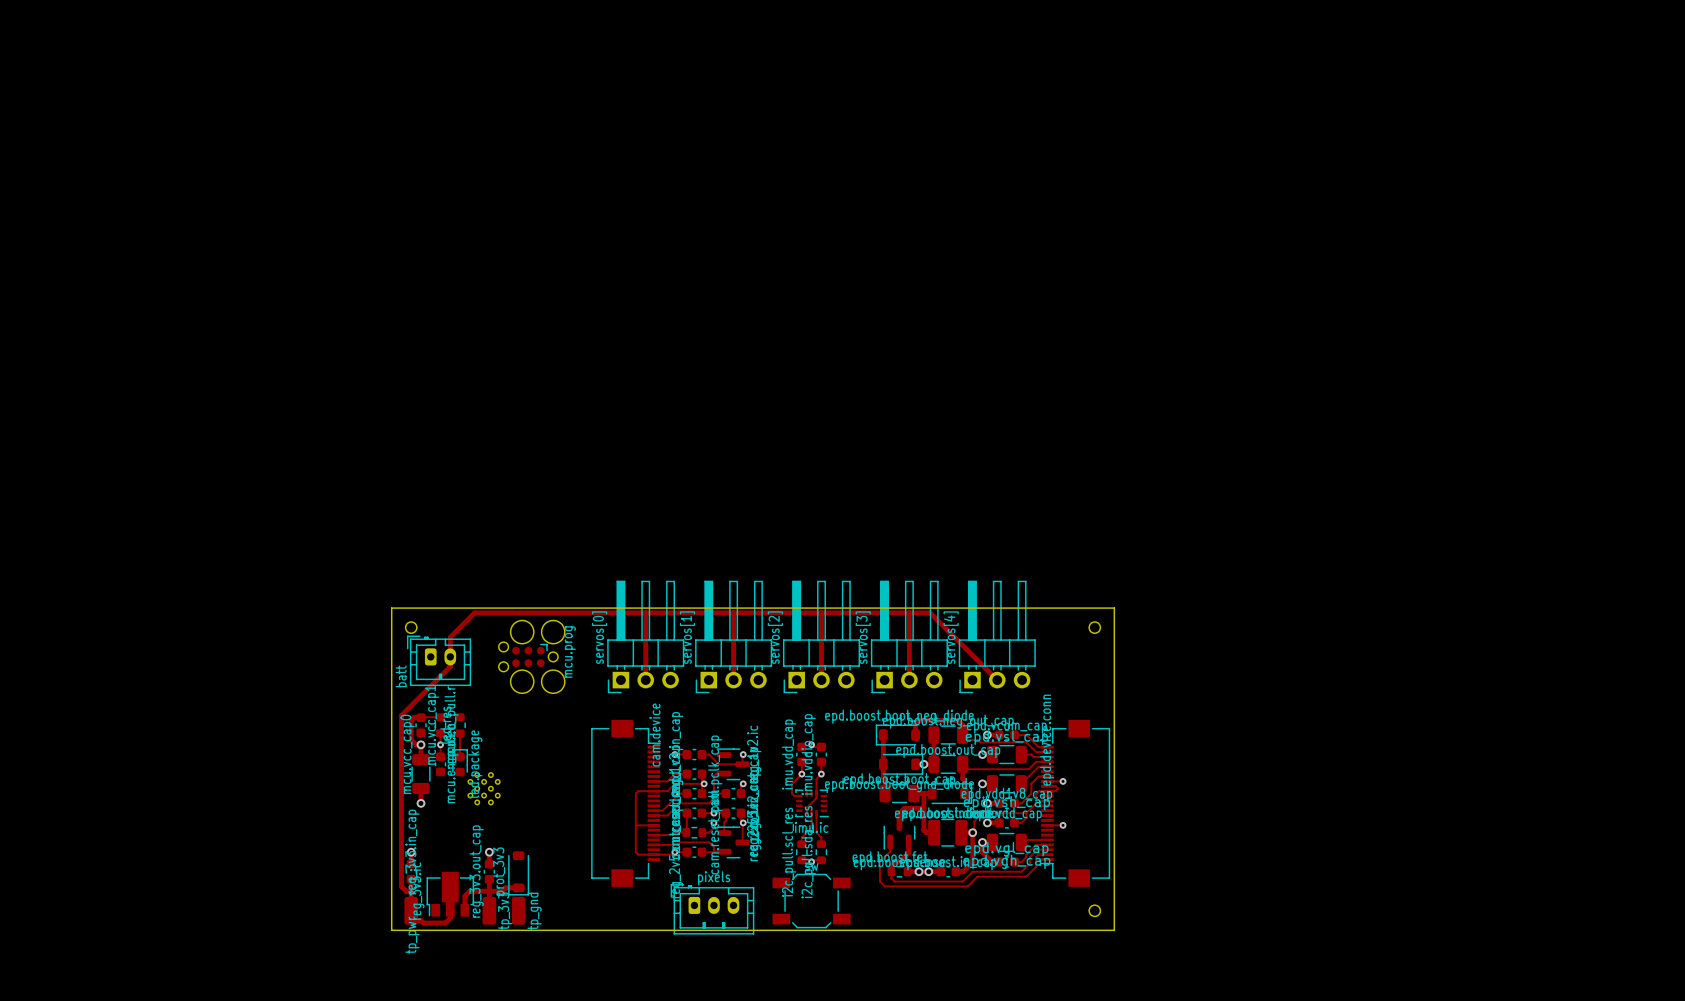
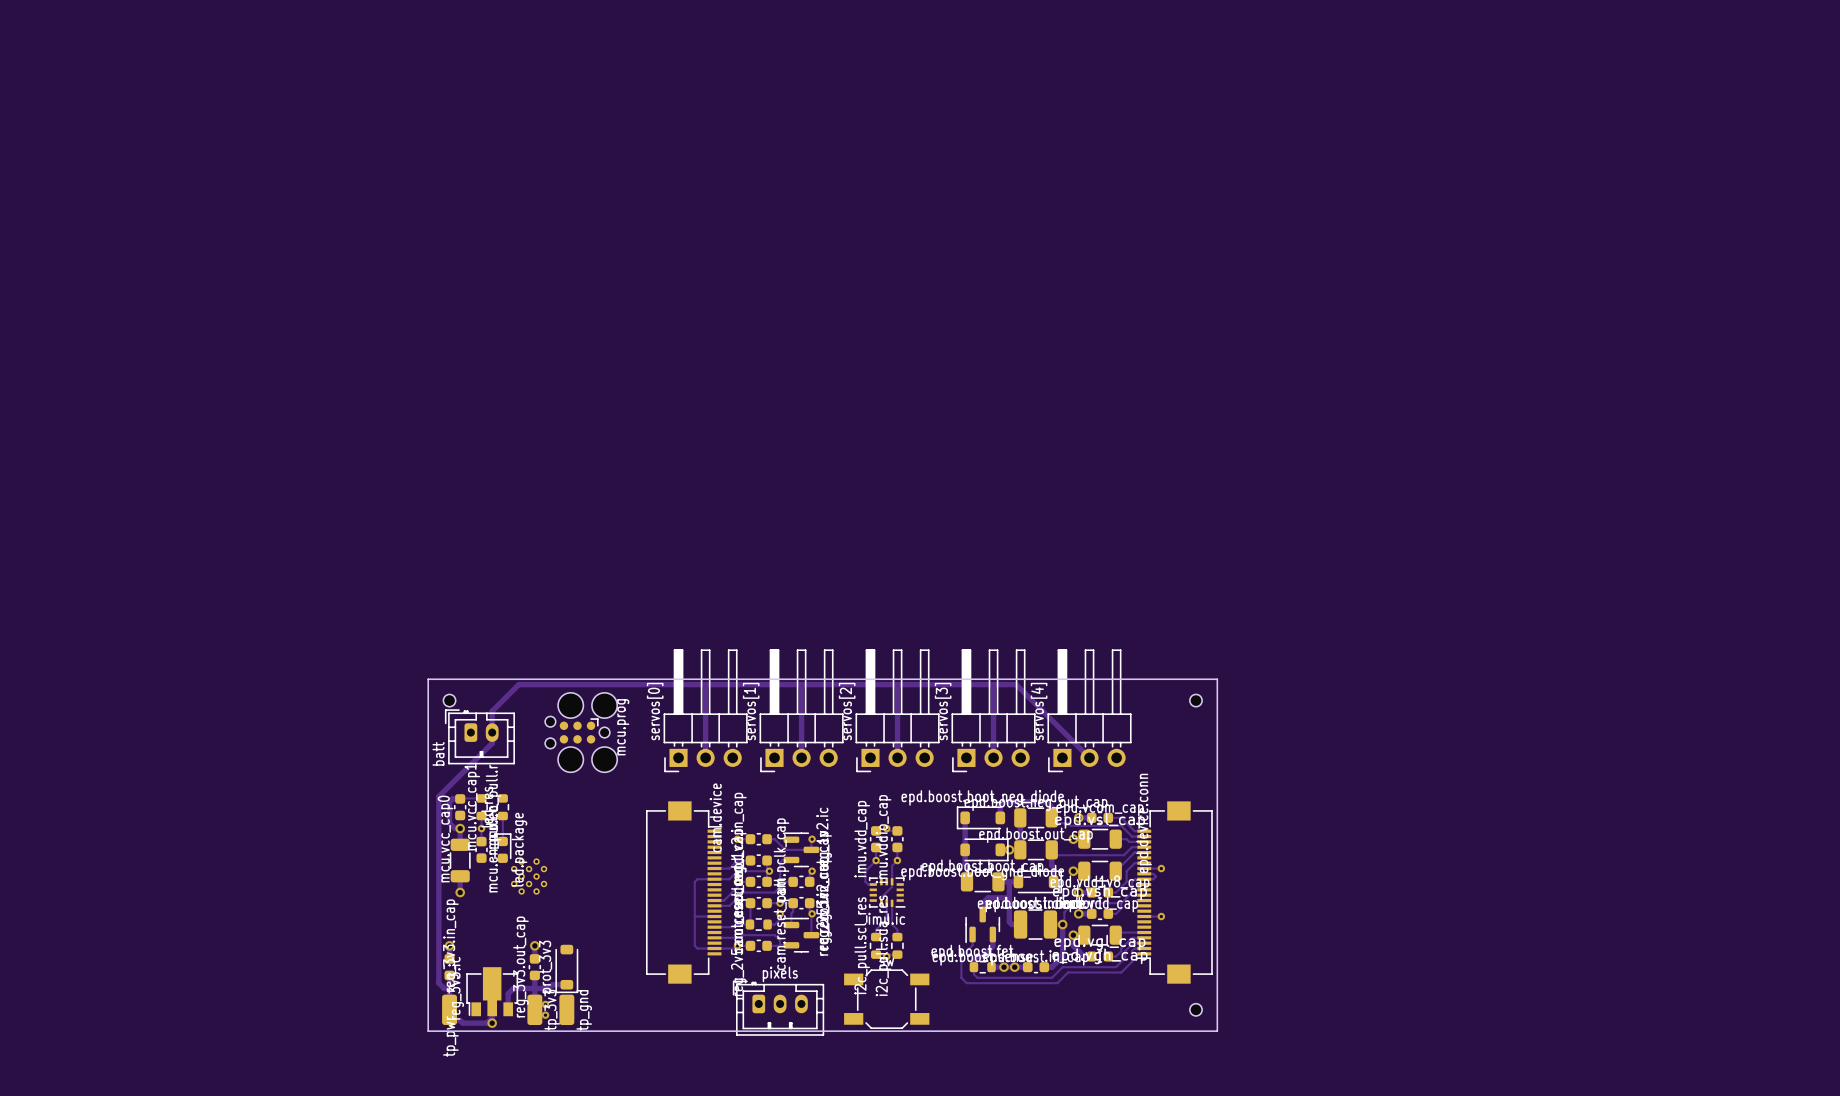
via: none -> (545, 1004)
via: none -> (545, 1015)
via: none -> (492, 1023)

